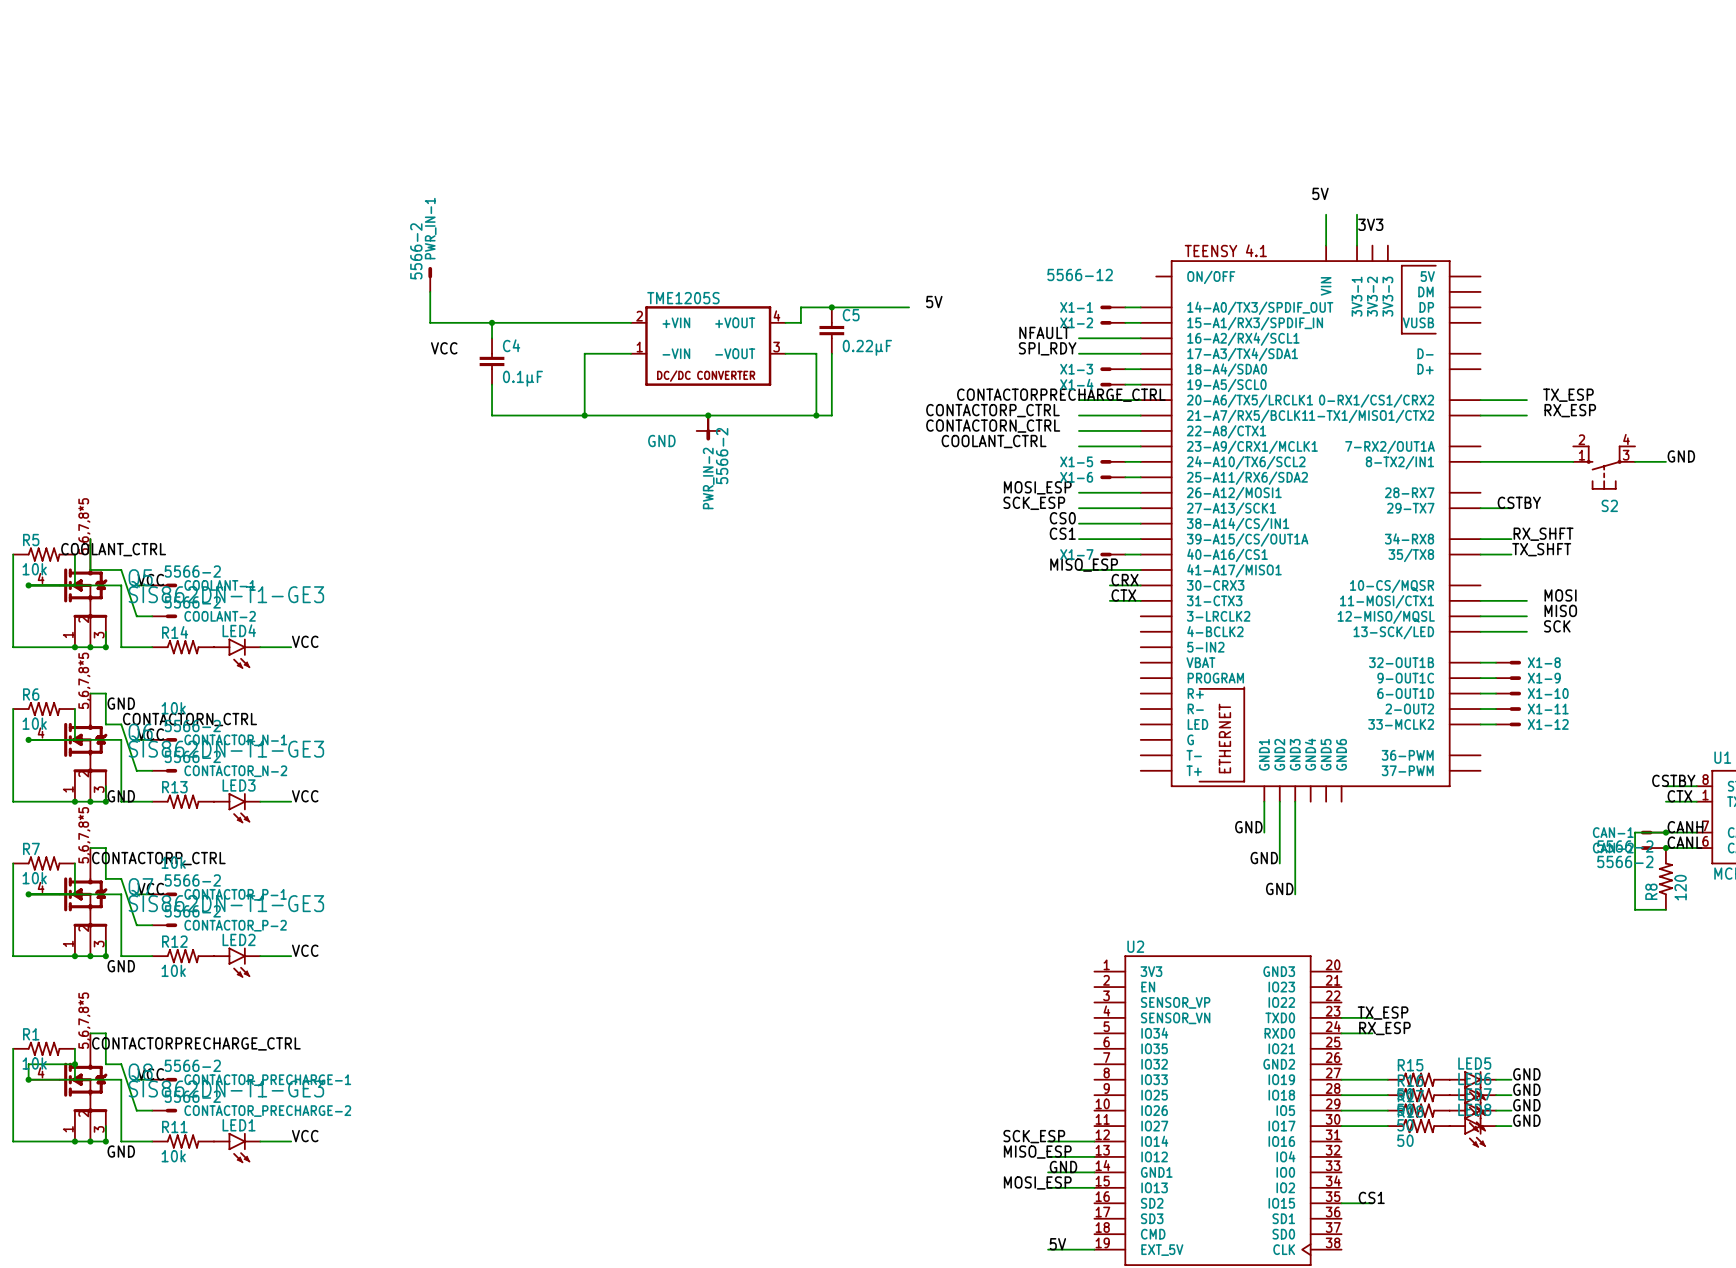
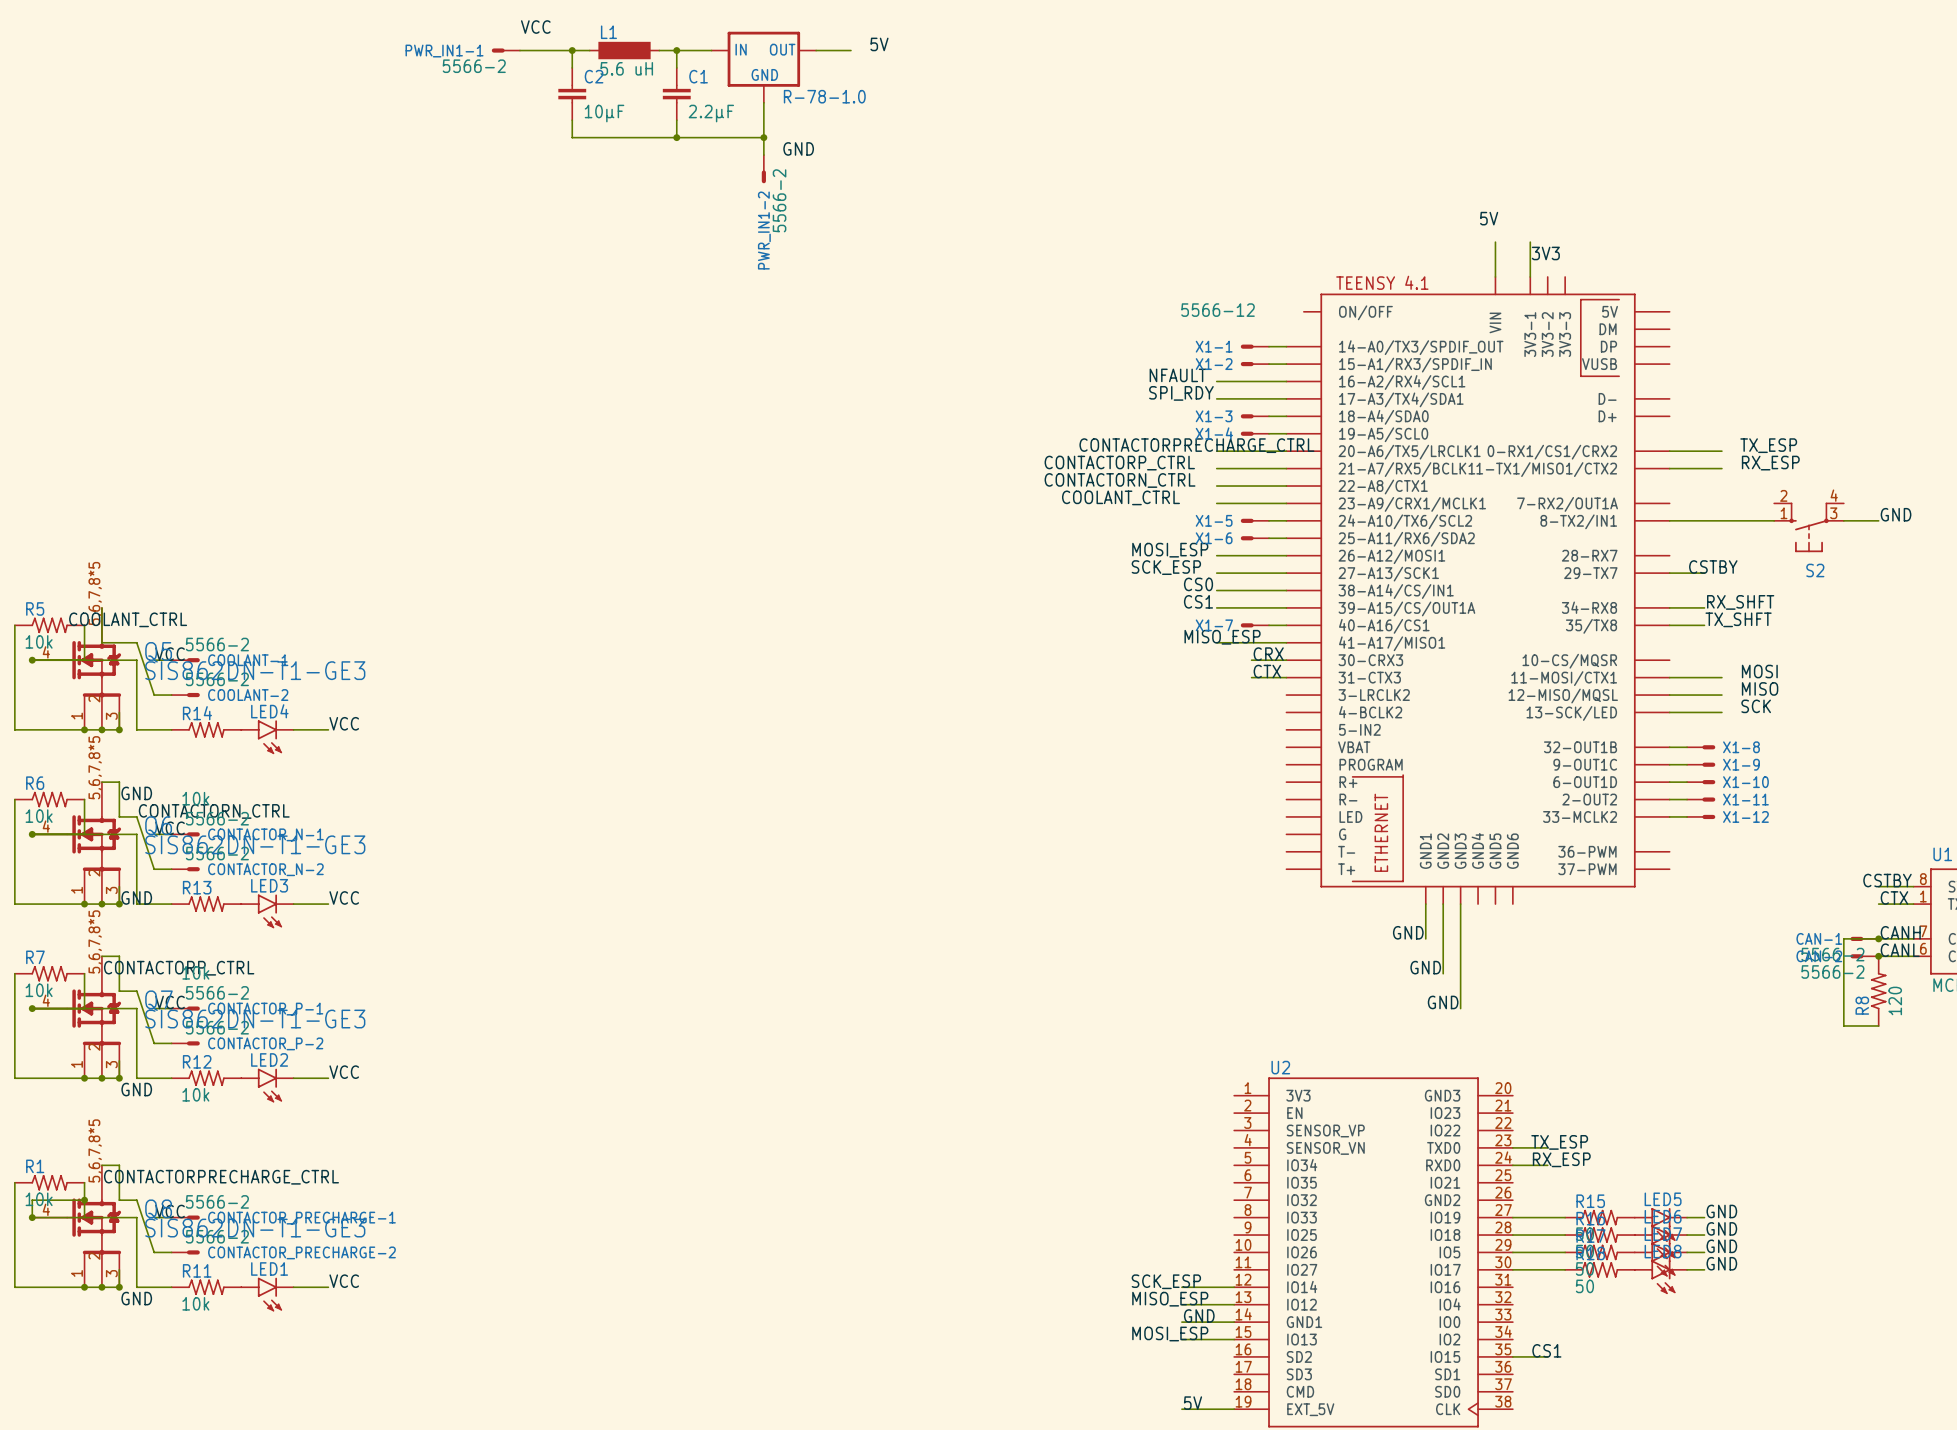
label: none -> VCC (535, 27)
label: none -> 5V (879, 44)
PWR_IN1-1: none -> 5566-2 (505, 50)
wire: none -> (520, 50) (589, 50)
wire: none -> (572, 50) (572, 67)
junction: none -> (572, 50)
L1: none -> 5.6 uH (624, 50)
wire: none -> (659, 50) (711, 50)
wire: none -> (676, 50) (676, 67)
junction: none -> (676, 50)
wire: none -> (816, 50) (850, 50)
R-78-1.0: none -> (763, 67)
C2: none -> 10μF (572, 94)
C1: none -> 2.2μF (676, 94)
wire: none -> (763, 102) (763, 155)
wire: none -> (572, 120) (572, 137) (763, 137)
wire: none -> (676, 120) (676, 137)
junction: none -> (676, 137)
junction: none -> (763, 137)
label: none -> GND (798, 148)
PWR_IN1-2: none -> 5566-2 (763, 169)
PWR_IN-1: 5566-2 (430, 279) -> none
wire: (430, 291) (430, 322) (631, 322) -> none
label: 5V (934, 302) -> none
junction: (831, 307) -> none
wire: (909, 307) (800, 307) (800, 322) (785, 322) -> none
wire: (492, 322) (492, 338) -> none
junction: (492, 322) -> none
C5: 0.22μF (831, 330) -> none
TME1205S: (708, 346) -> none
label: VCC (444, 348) -> none
wire: (631, 353) (584, 353) (584, 415) -> none
wire: (785, 353) (816, 353) (816, 415) -> none
wire: (831, 353) (831, 415) (492, 415) (492, 384) -> none
C4: 0.1μF (492, 361) -> none
junction: (584, 415) -> none
junction: (708, 415) -> none
junction: (816, 415) -> none
power symbol: GND (708, 423) -> none
PWR_IN-2: 5566-2 (708, 428) -> none

